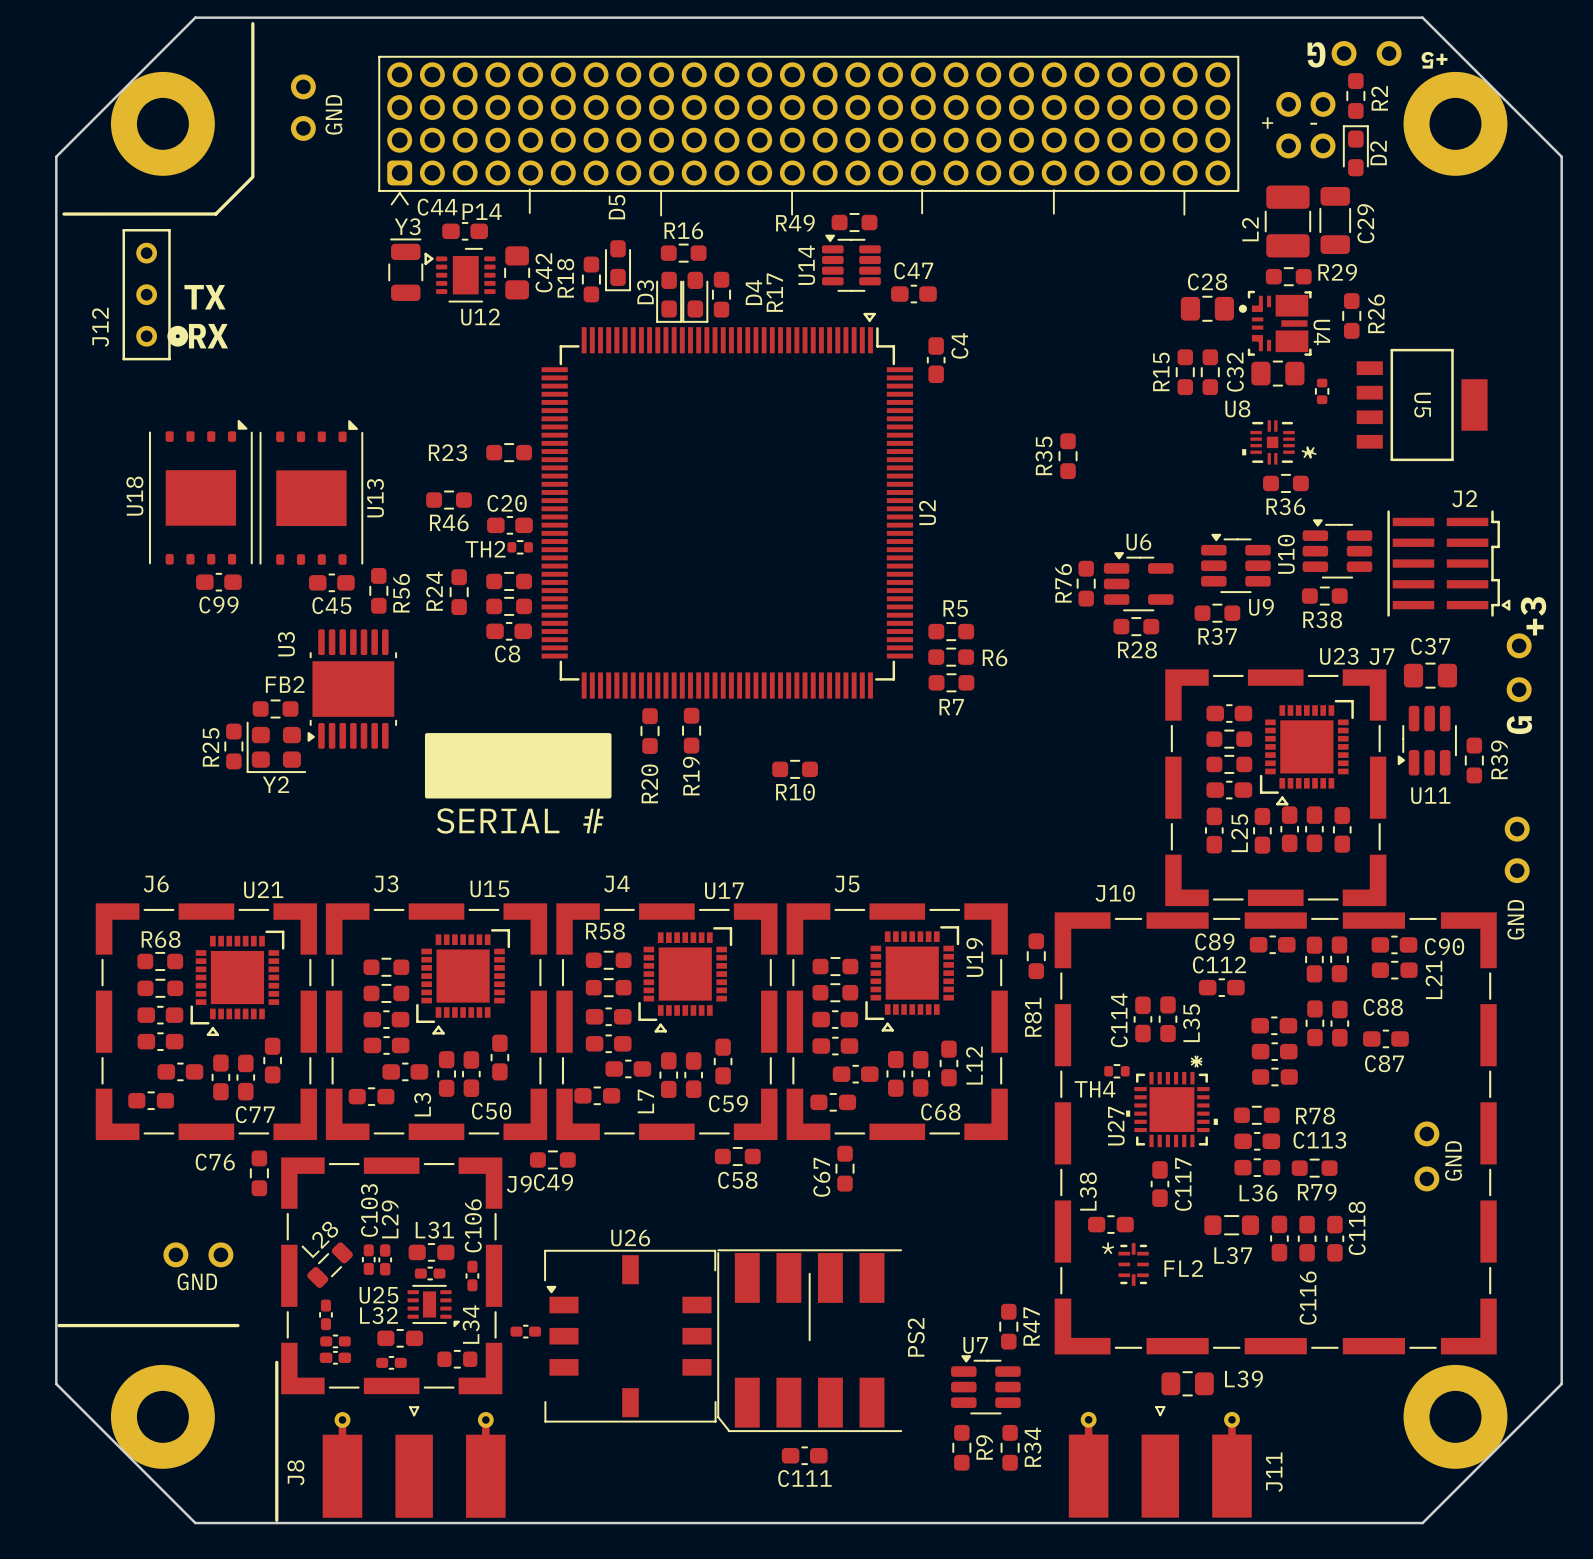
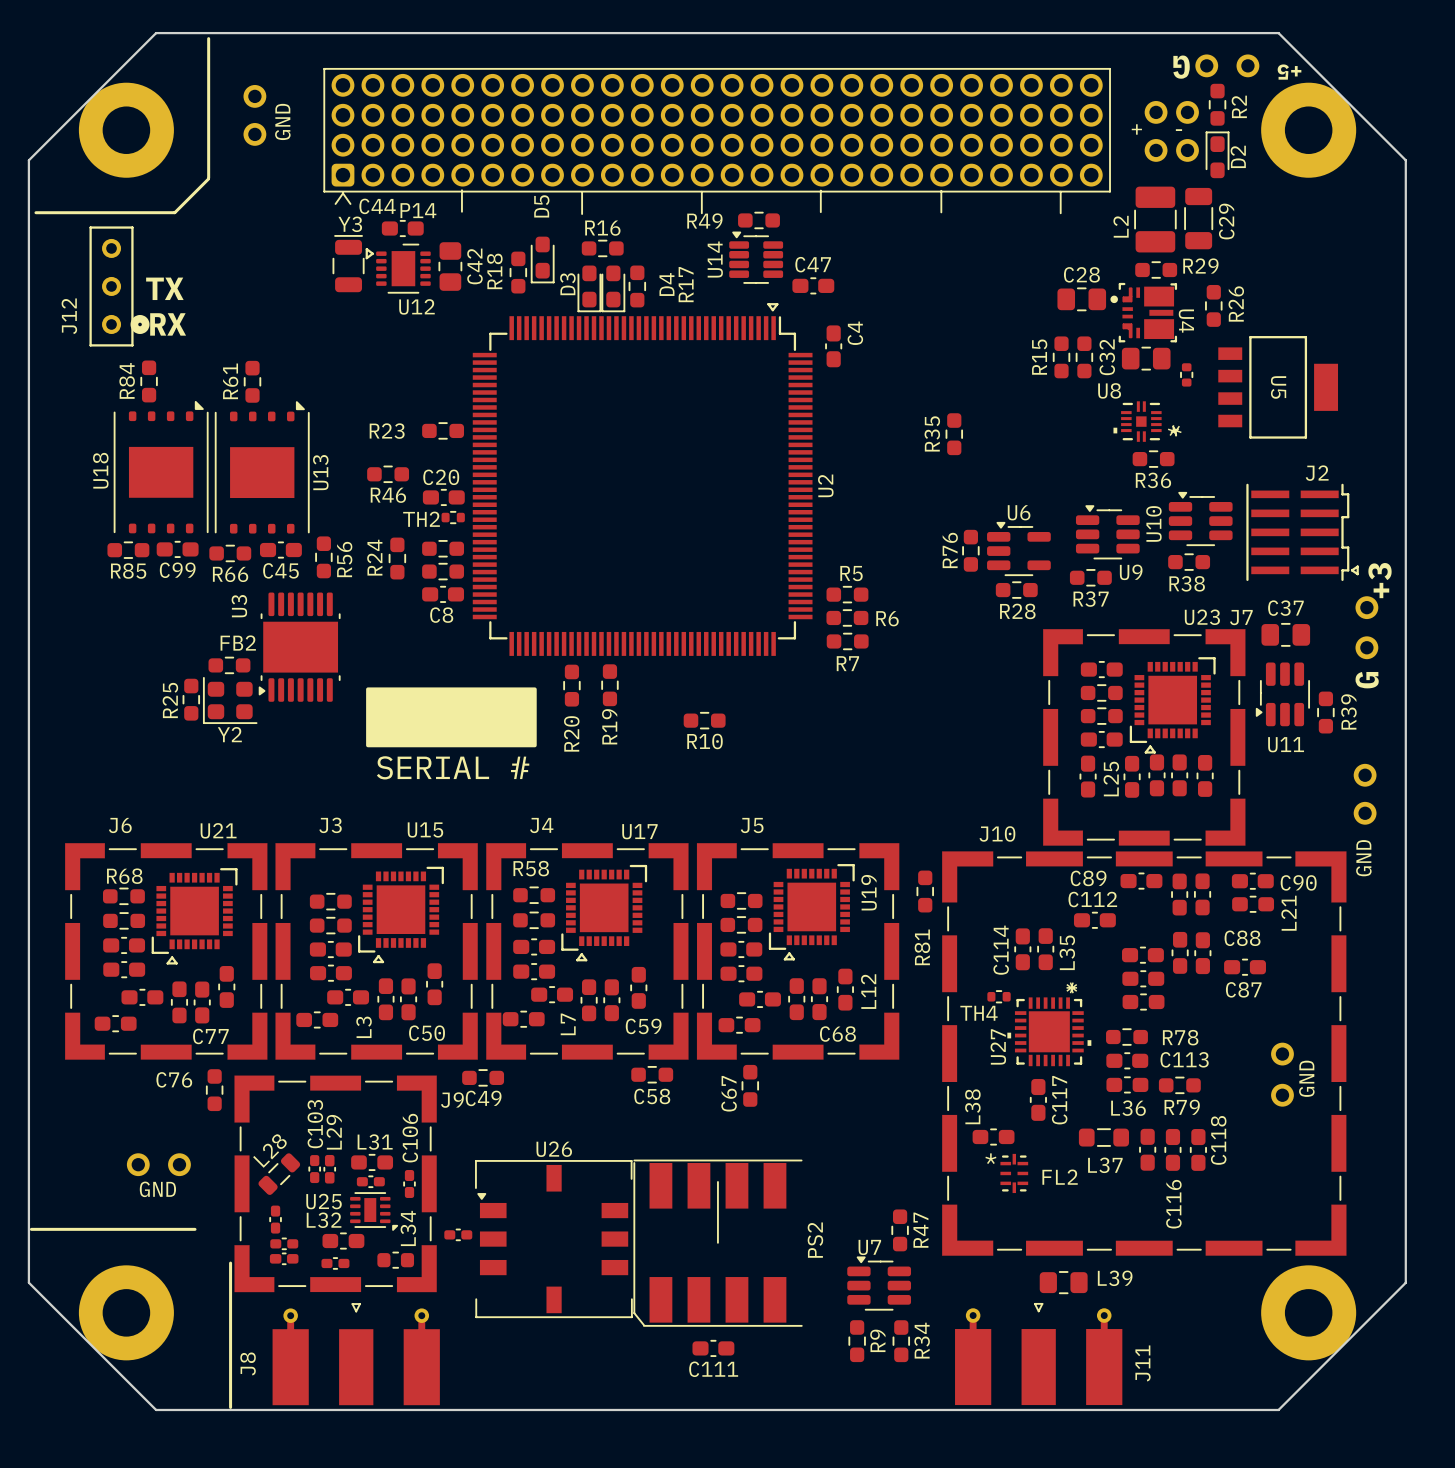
R84: none -> (149, 381)
R61: none -> (252, 381)
R85: none -> (128, 550)
R66: none -> (230, 553)

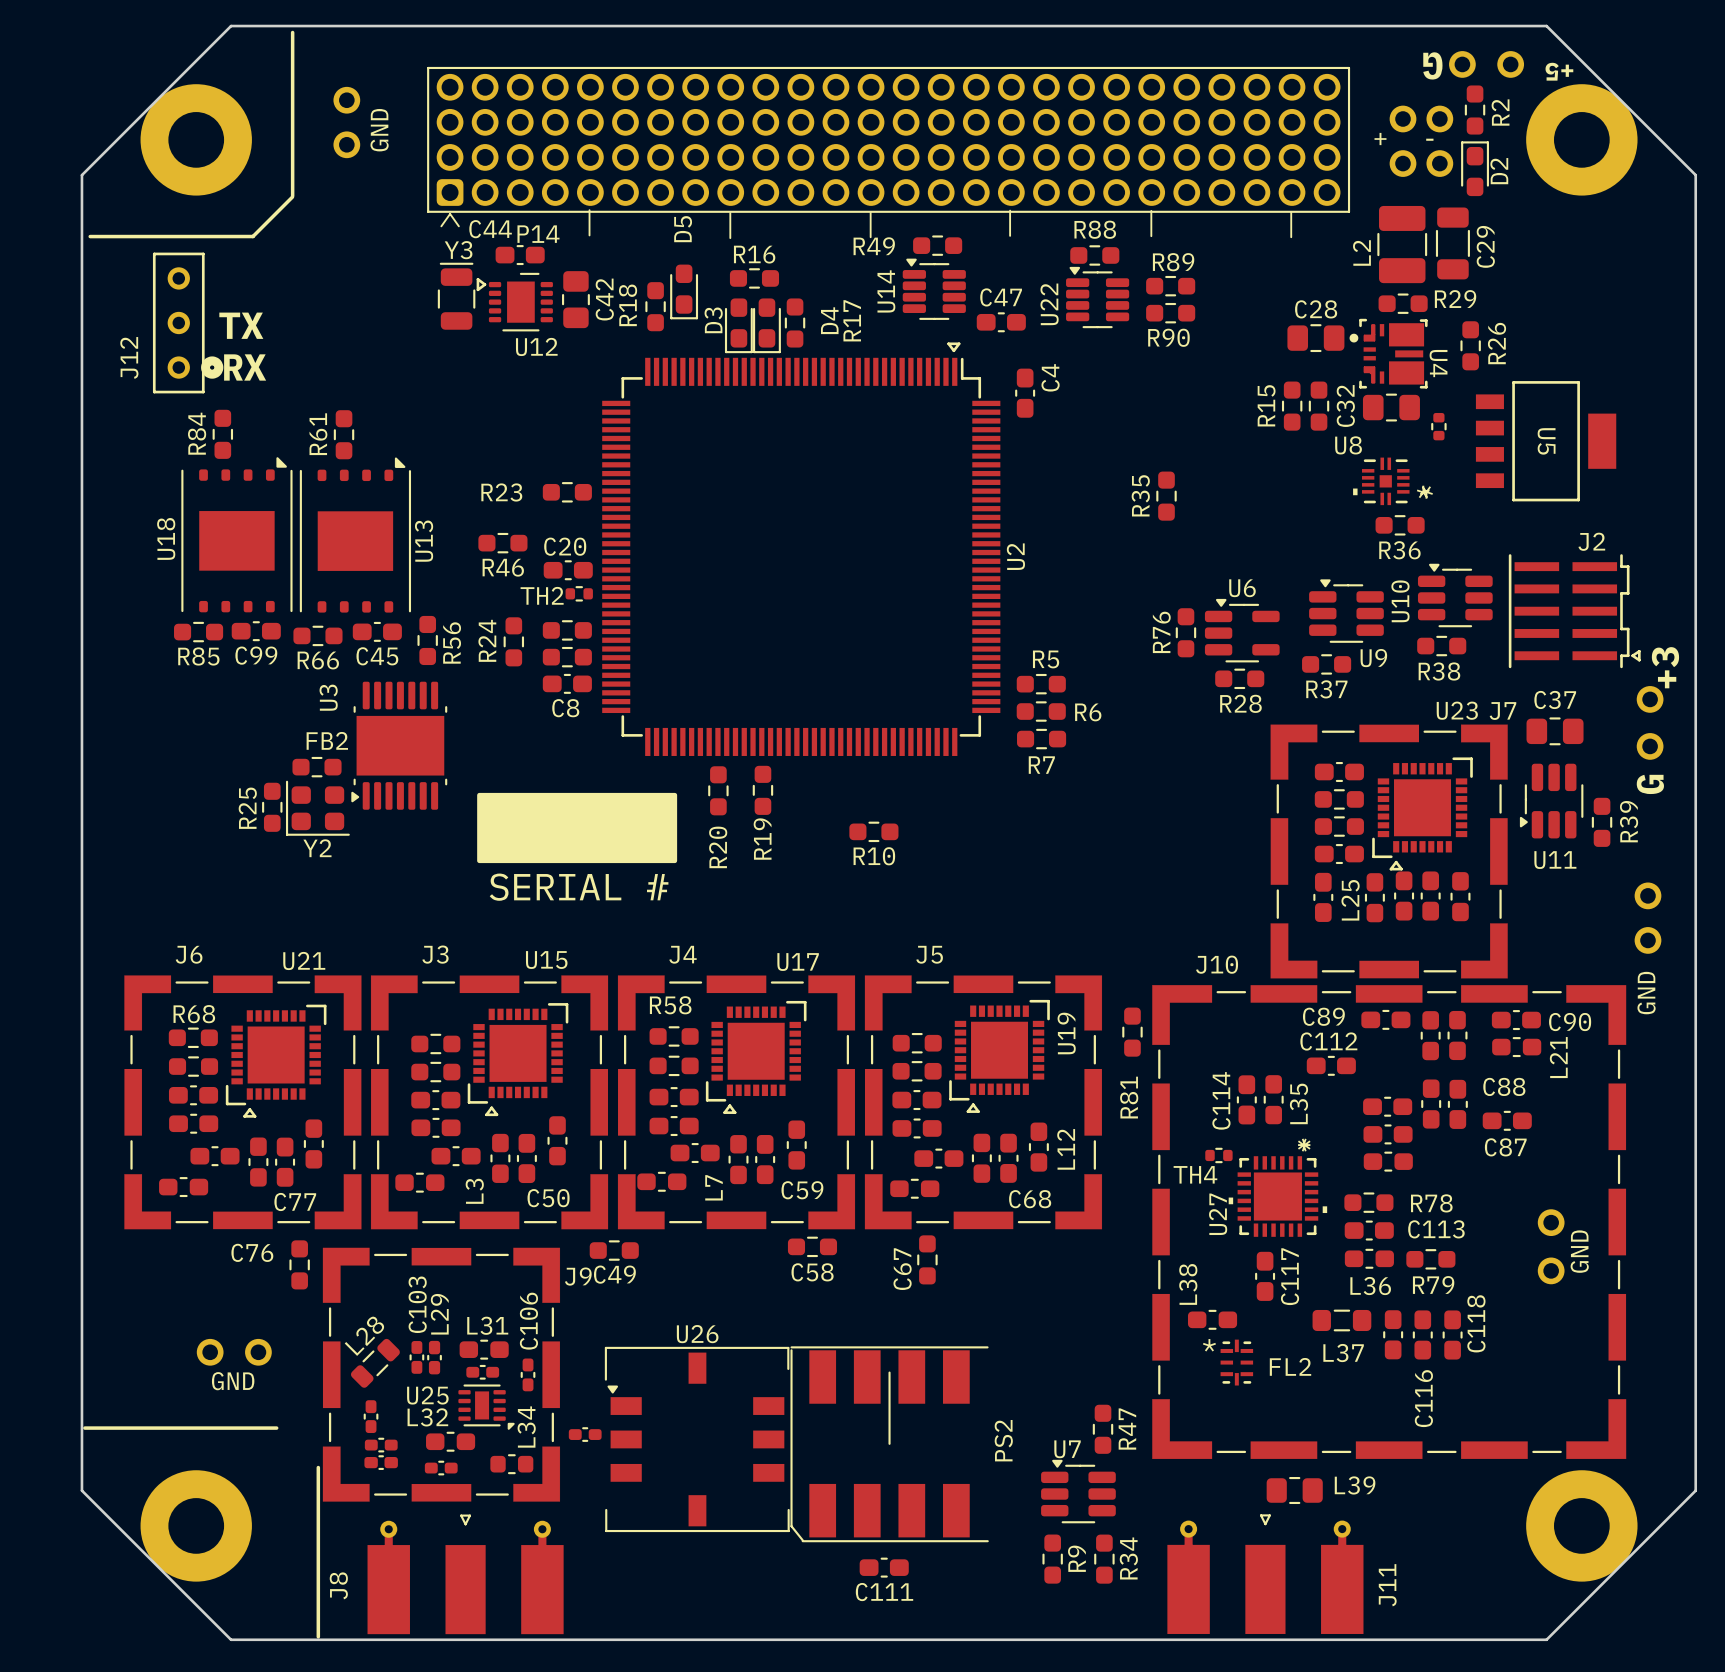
R88: none -> (1094, 255)
R89: none -> (1170, 286)
U22: none -> (1097, 297)
R90: none -> (1170, 313)

